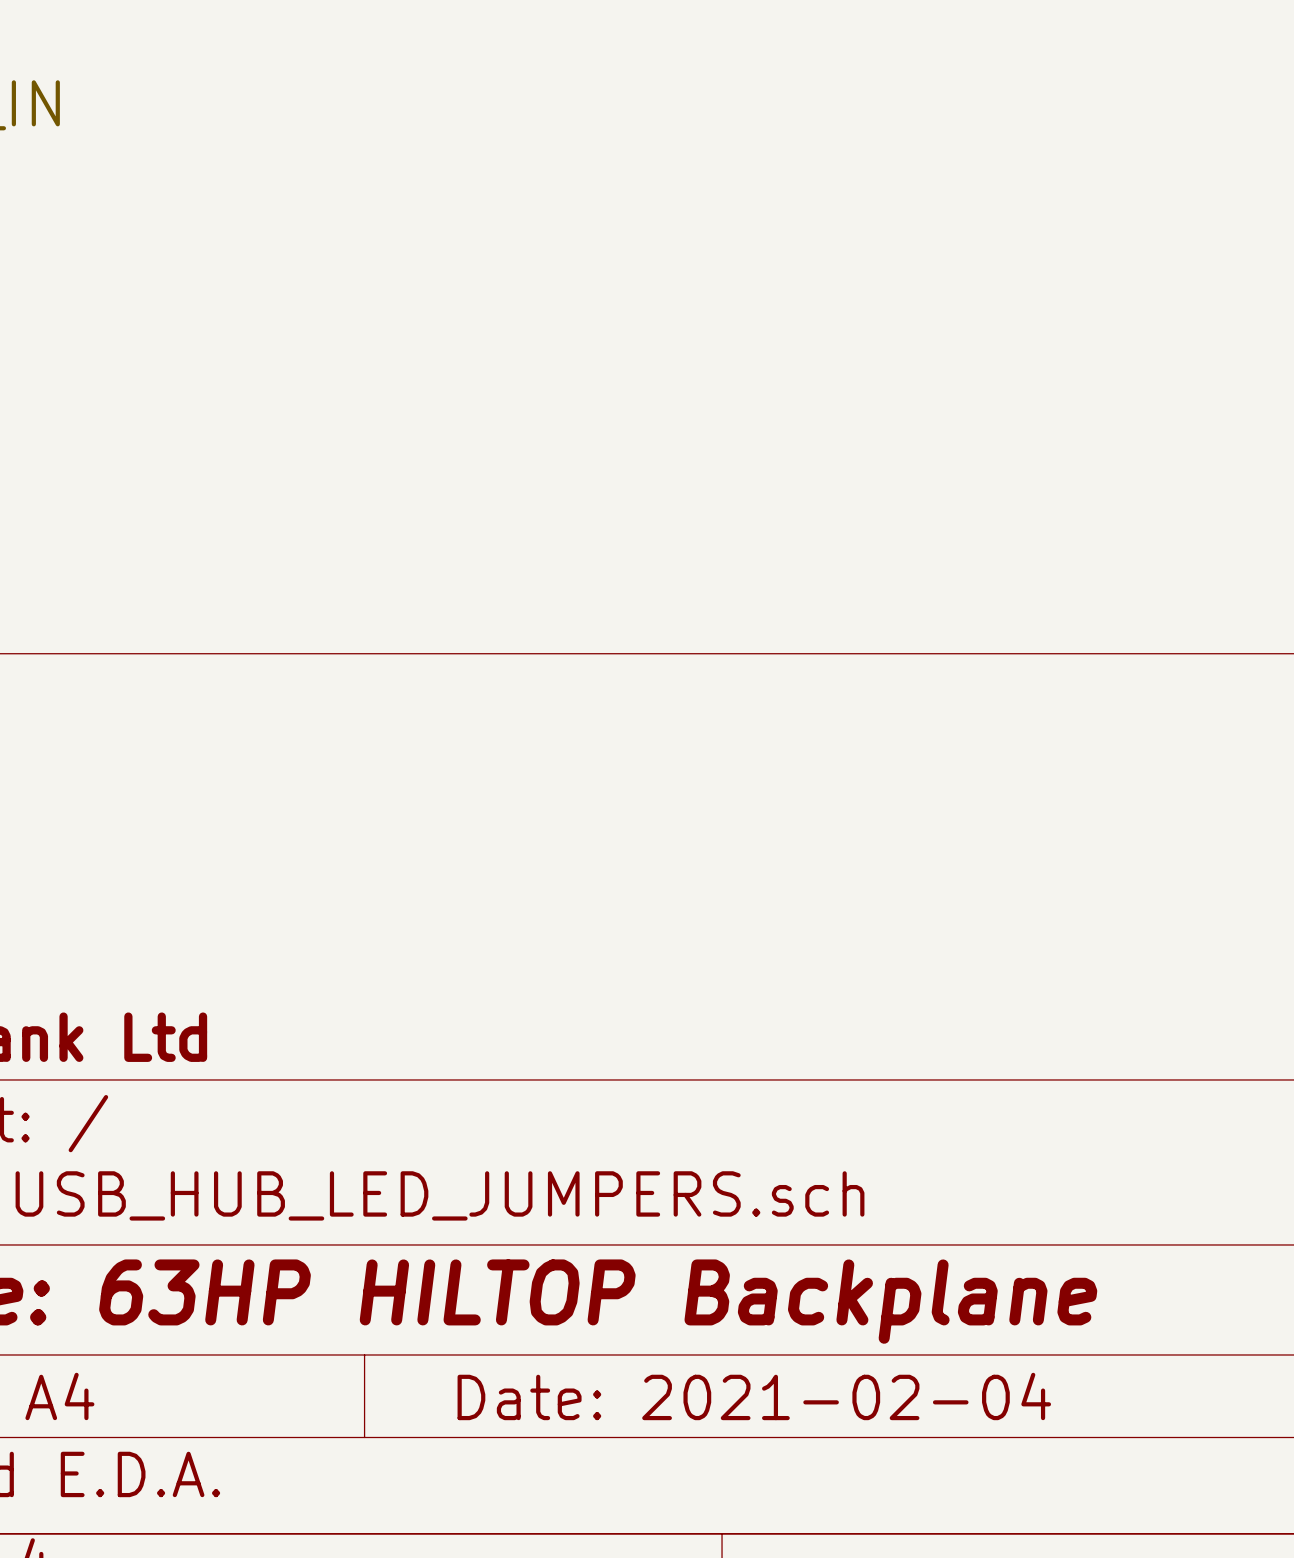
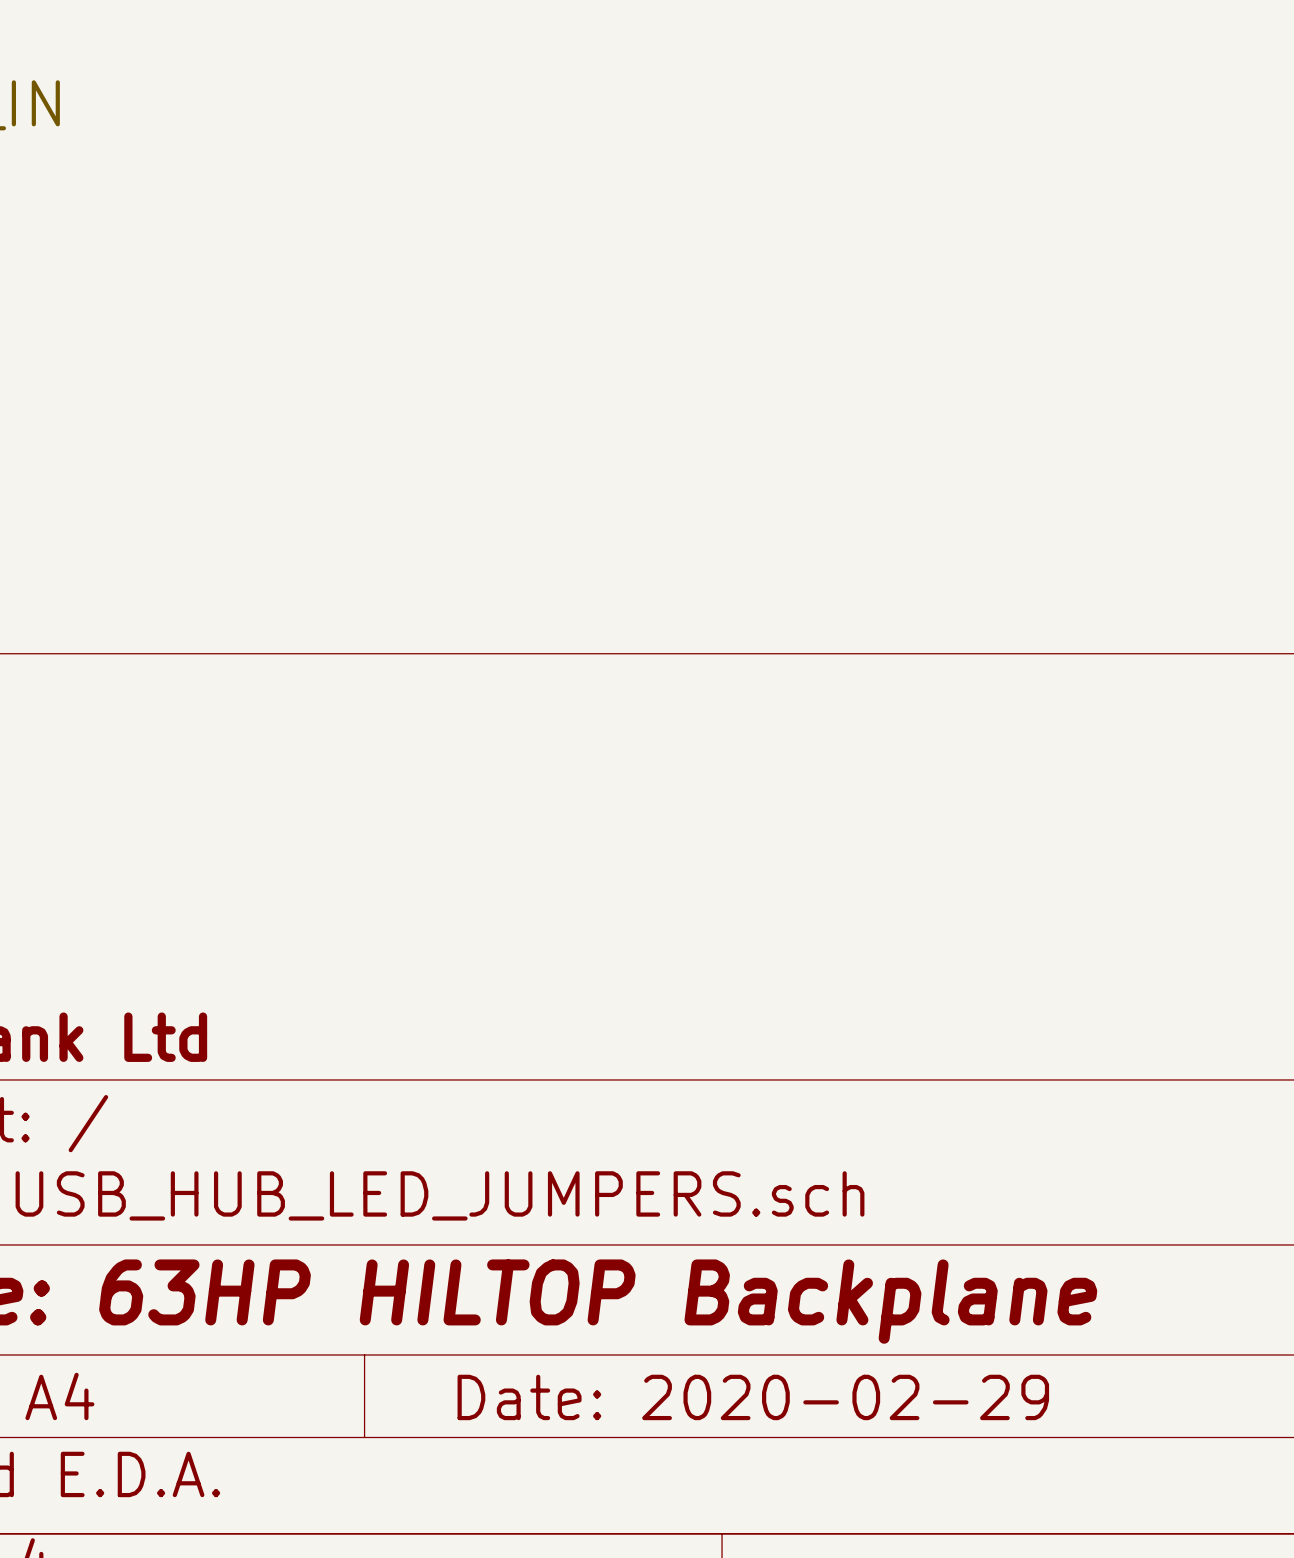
title block: Date: 2021-02-04 (754, 1396) -> Date: 2020-02-29 (753, 1397)

